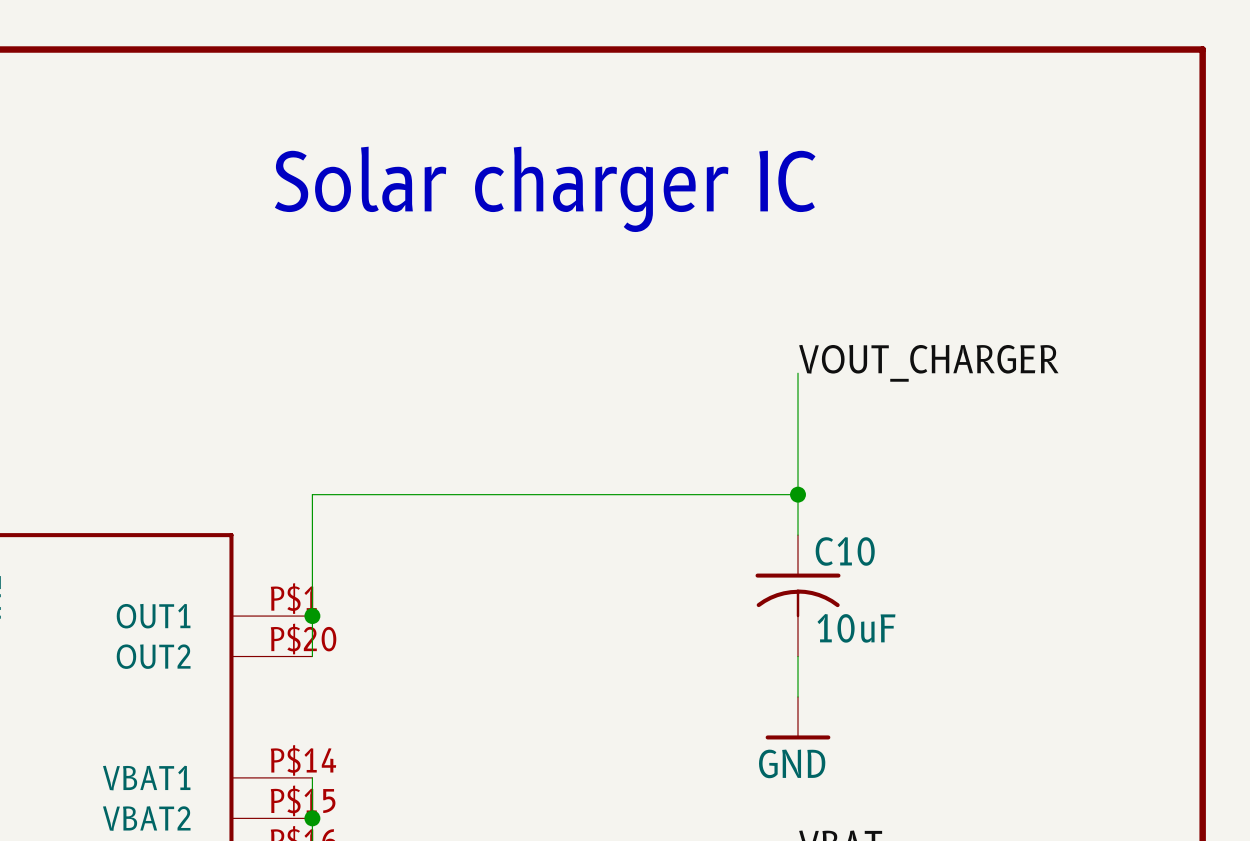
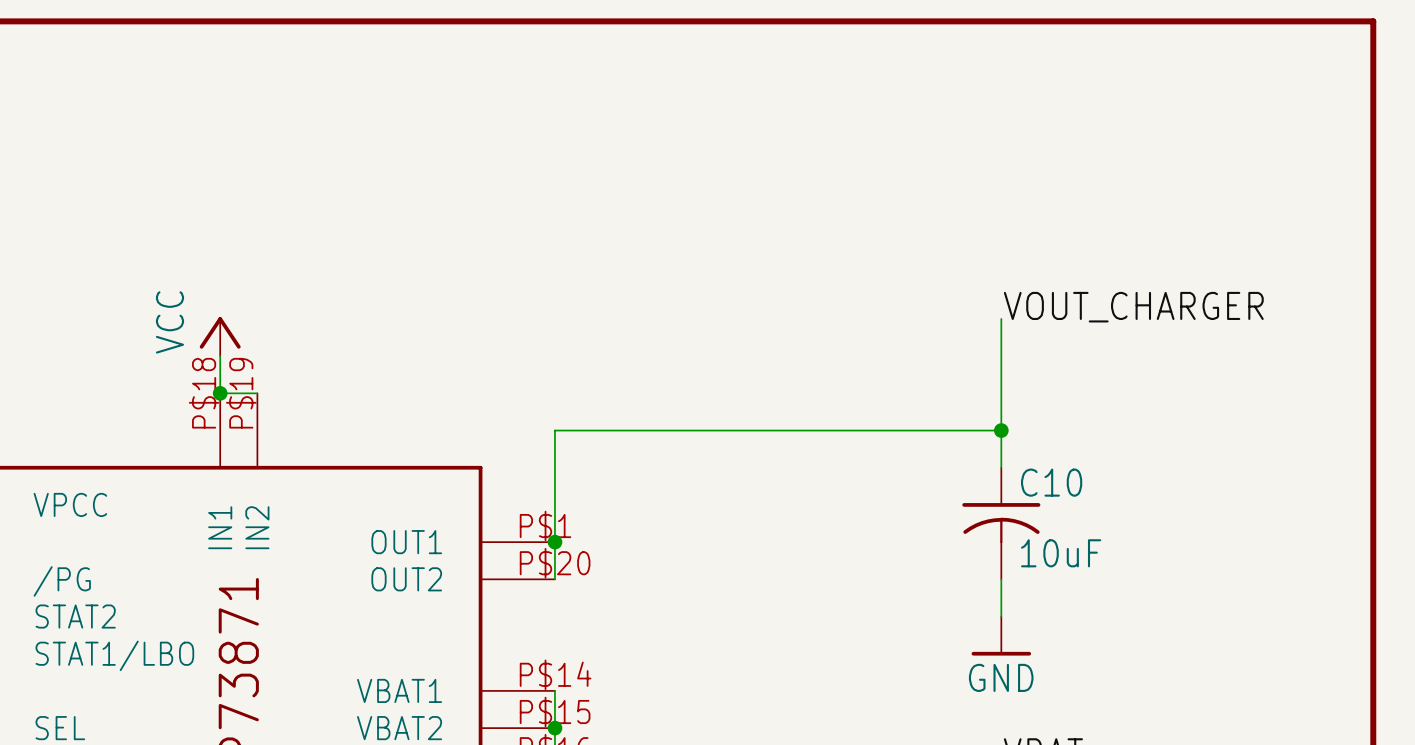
text: Solar charger IC (545, 189) -> none

